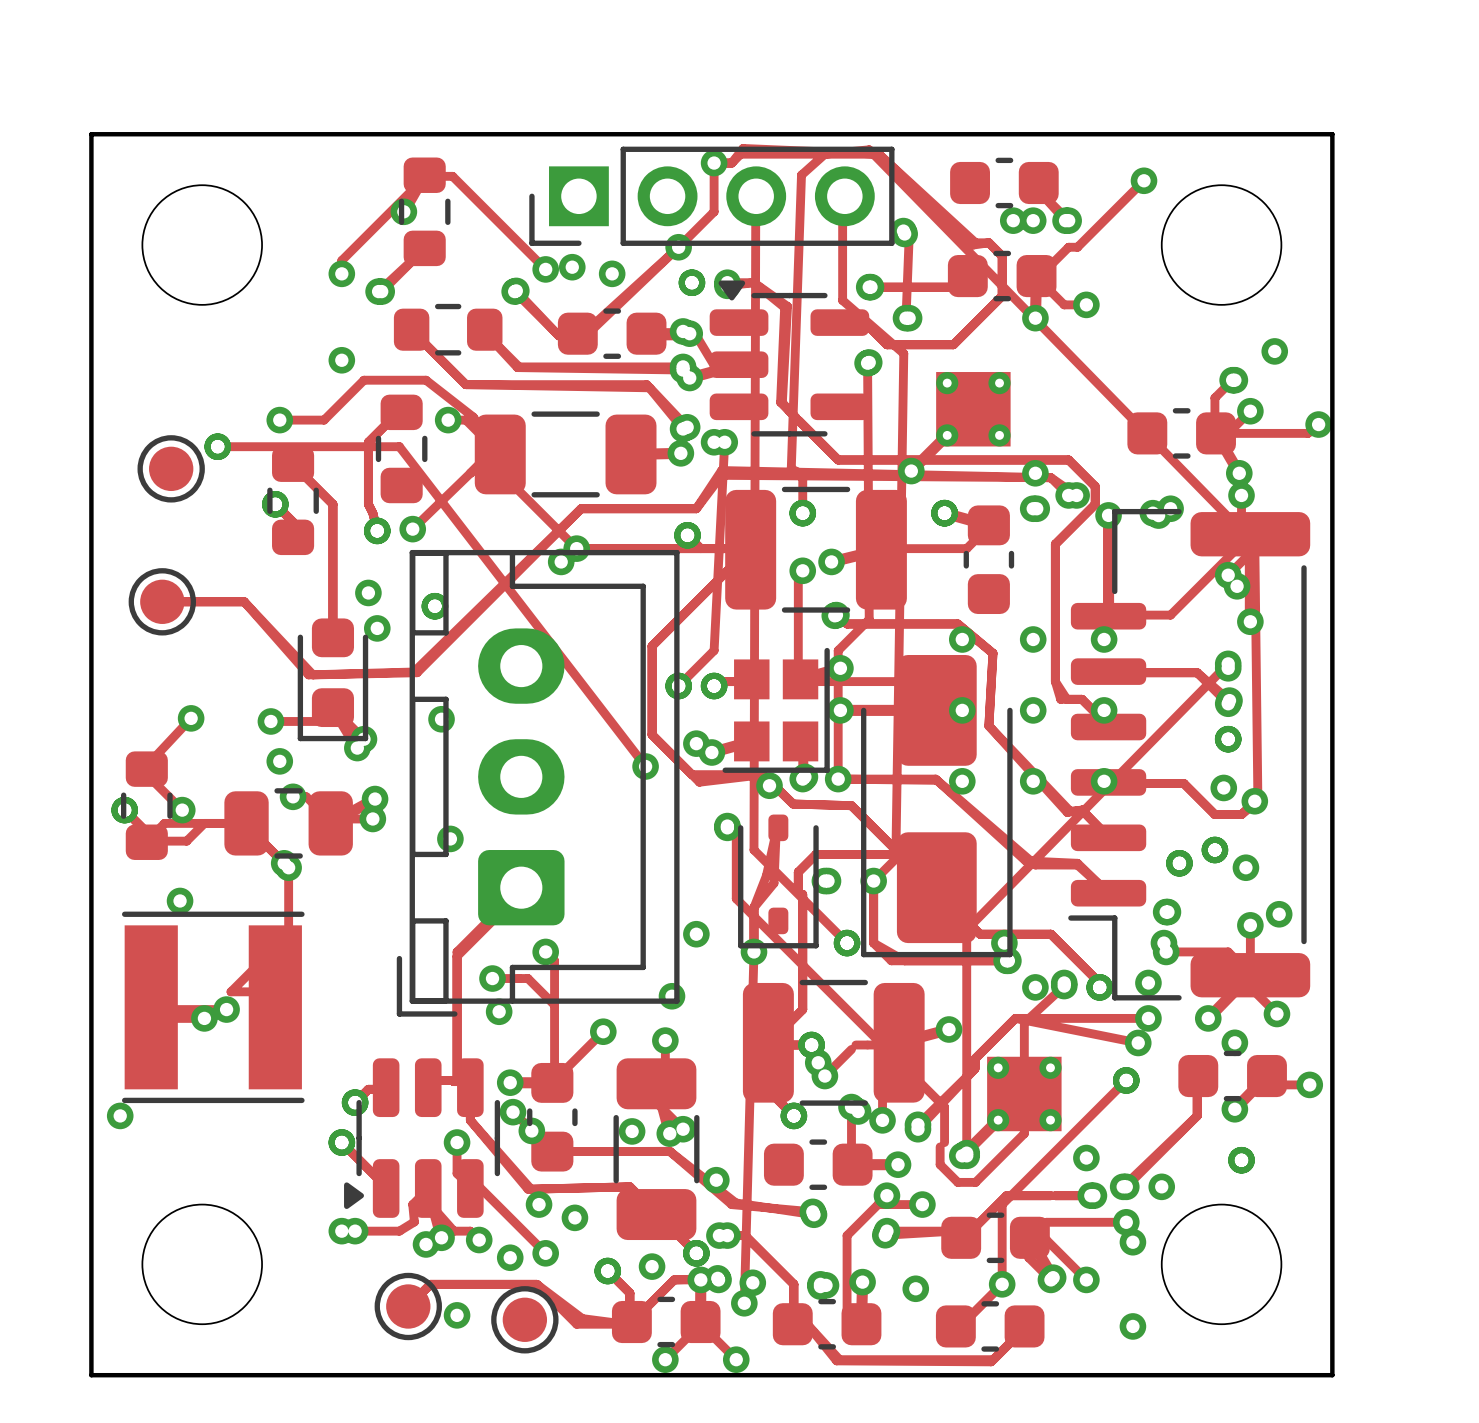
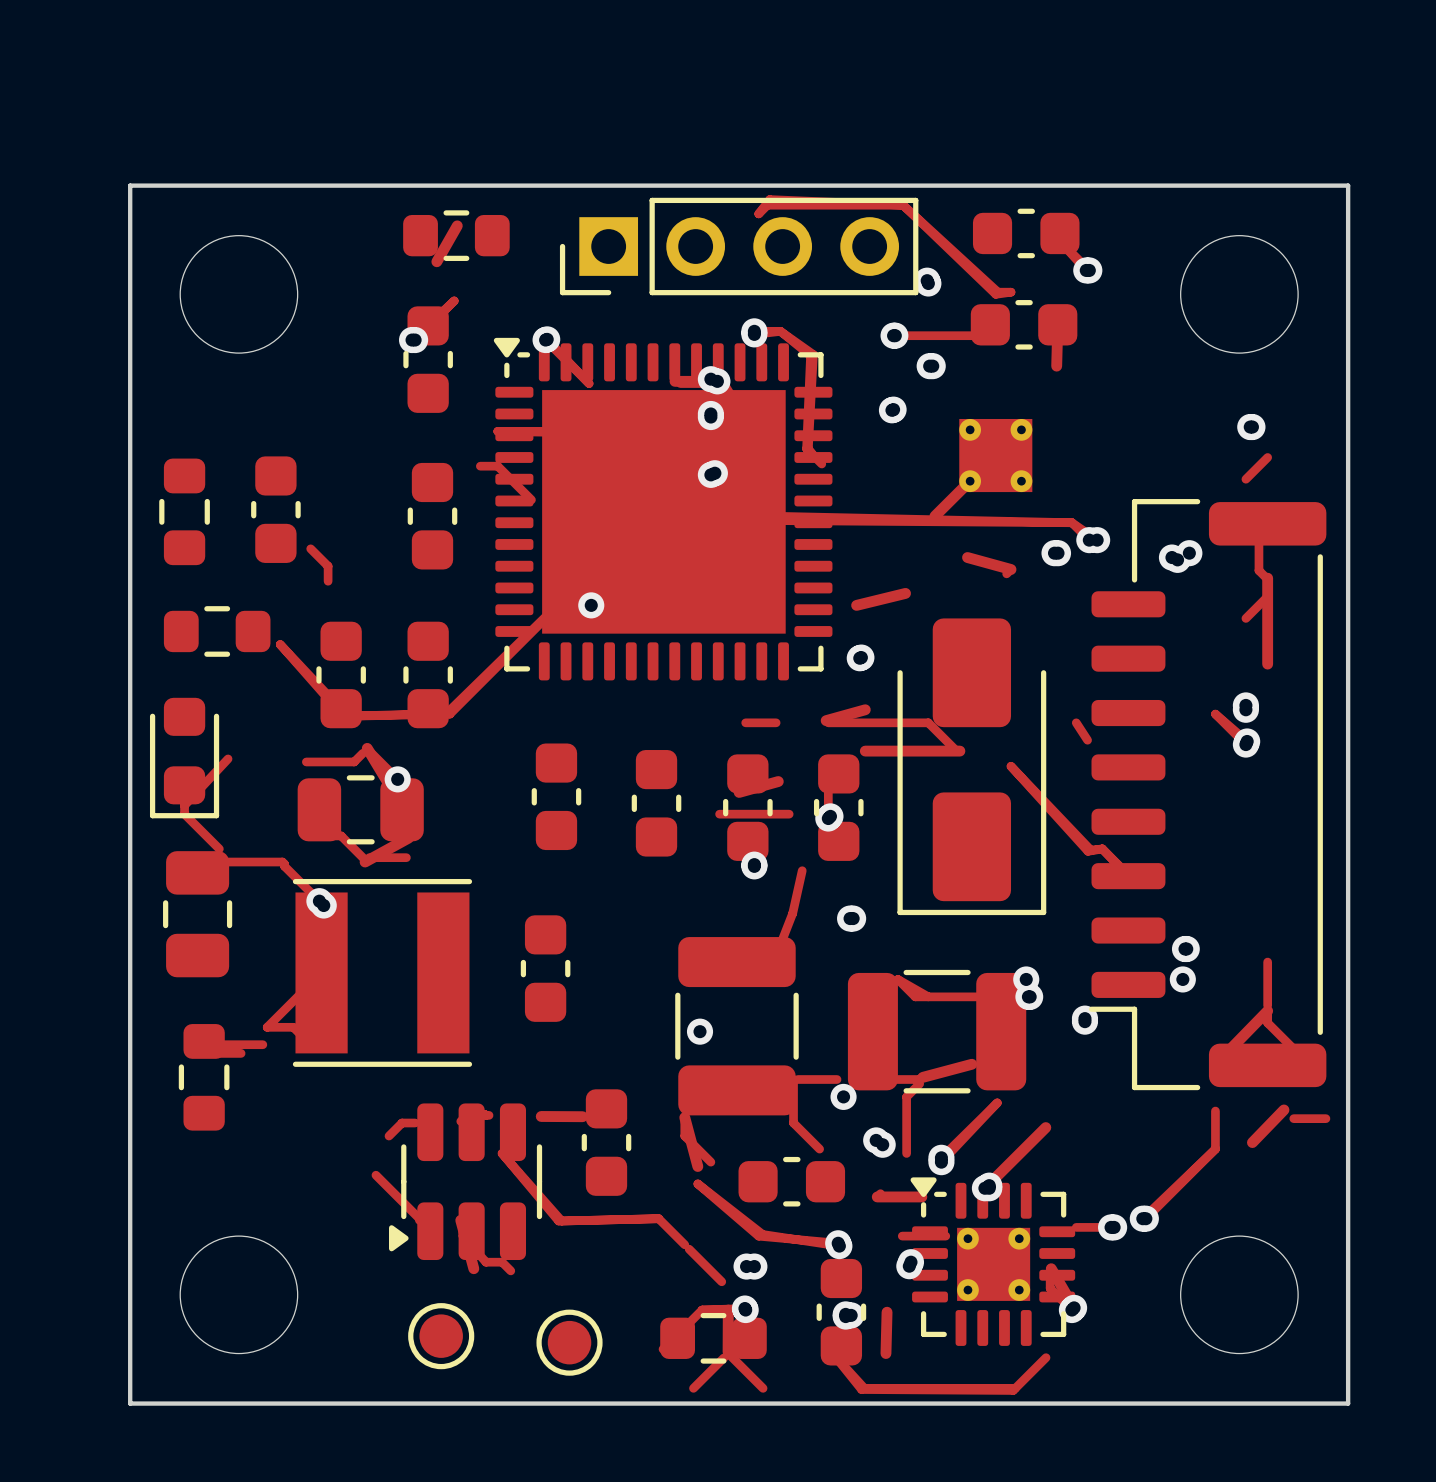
via: (714, 163) -> none
track: (731, 163) (714, 163) (714, 211) (678, 247) -> none
track: (425, 176) (452, 176) (545, 269) -> none
track: (424, 177) (341, 260) (341, 273) -> none
track: (1144, 180) (1077, 247) (1068, 247) (1039, 276) -> none
via: (1144, 180) -> none
track: (756, 196) (753, 850) (847, 943) -> none
track: (844, 196) (842, 202) (842, 300) (903, 353) (895, 858) (873, 881) (873, 943) -> none
via: (403, 211) -> none
part rotation: 0° (424, 211) -> 90° clockwise (456, 235)
via: (1013, 220) -> none
via: (1033, 220) -> none
track: (903, 231) (909, 238) (906, 318) -> none
track: (988, 242) (1002, 256) (1002, 296) (953, 344) (886, 344) (864, 322) (839, 322) -> none
track: (678, 247) (586, 330) (585, 335) (580, 335) (588, 333) (678, 247) -> none
via: (678, 247) -> none
via: (572, 267) -> none
via: (545, 269) -> none
via: (341, 273) -> none
via: (612, 273) -> none
via: (691, 282) -> none
track: (1042, 282) (1064, 304) (1086, 304) -> none
via: (1086, 304) -> none
part: none -> (428, 359)
via: (1035, 318) -> none
track: (411, 329) (465, 384) -> none
part: (448, 329) -> none
part: (612, 333) -> none
via: (1274, 351) -> none
part: (789, 358) -> none
via: (341, 360) -> none
track: (867, 363) (869, 619) (838, 650) (838, 779) -> none
track: (683, 366) (519, 366) (488, 335) (517, 367) (683, 370) -> none
via: (689, 378) -> none
track: (1232, 380) (1214, 397) (1214, 428) -> none
part footprint: [375, 394, 428, 504] -> [407, 462, 458, 570]
via: (1250, 411) -> none
track: (395, 415) (368, 442) (368, 504) (377, 530) -> none
track: (279, 420) (324, 420) (363, 380) (426, 380) (473, 417) (499, 453) -> none
via: (279, 420) -> none
via: (448, 420) -> none
track: (798, 420) (838, 459) (1068, 459) (1095, 486) (1095, 504) (1055, 544) (1055, 681) (1060, 699) (1081, 699) (1108, 725) -> none
track: (1318, 424) (1307, 433) (1216, 433) (1239, 473) -> none
via: (1318, 424) -> none
part: (1181, 433) -> none
part footprint: [137, 435, 205, 503] -> [159, 458, 210, 566]
via: (714, 442) -> none
track: (724, 442) (714, 650) (678, 686) -> none
via: (724, 442) -> none
track: (217, 446) (399, 446) (645, 766) -> none
via: (217, 446) -> none
via: (680, 453) -> none
part: (565, 454) -> none
track: (496, 455) (488, 455) (412, 529) -> none
track: (485, 457) (576, 548) (745, 548) -> none
part: none -> (663, 509)
part: none -> (275, 509)
track: (293, 464) (332, 504) (332, 637) -> none
via: (911, 471) -> none
via: (1035, 473) -> none
via: (1239, 473) -> none
via: (1241, 495) -> none
part: (293, 500) -> none
via: (275, 504) -> none
track: (581, 508) (696, 508) -> none
part footprint: [1068, 508, 1311, 1001] -> [1088, 499, 1327, 1091]
track: (802, 513) (802, 474) (791, 468) (801, 175) (824, 154) (869, 149) (1254, 544) (1257, 801) (1241, 814) -> none
via: (802, 513) -> none
via: (944, 513) -> none
track: (1108, 515) (1108, 616) -> none
via: (1108, 515) -> none
via: (412, 529) -> none
via: (377, 530) -> none
track: (984, 530) (966, 548) (886, 548) -> none
via: (687, 535) -> none
track: (1245, 539) (1170, 615) (1112, 615) -> none
via: (576, 548) -> none
part footprint: [396, 549, 680, 1017] -> [531, 743, 582, 851]
part: (816, 549) -> none
track: (745, 553) (652, 646) (652, 734) (699, 782) (762, 774) (793, 804) (851, 805) (931, 885) -> none
part: (988, 559) -> none
via: (831, 561) -> none
part footprint: [128, 568, 197, 636] -> [163, 606, 271, 657]
via: (802, 570) -> none
track: (798, 575) (798, 677) -> none
via: (1228, 575) -> none
via: (1237, 586) -> none
via: (368, 592) -> none
track: (162, 601) (244, 601) -> none
via: (434, 606) -> none
via: (1250, 621) -> none
track: (847, 623) (957, 623) (992, 653) (988, 725) -> none
via: (377, 628) -> none
part: none -> (341, 674)
part: none -> (428, 674)
via: (962, 639) -> none
via: (1033, 639) -> none
via: (1104, 639) -> none
track: (1228, 663) (966, 929) (966, 1153) -> none
via: (840, 668) -> none
track: (1108, 671) (1197, 672) -> none
part position: (332, 679) -> (184, 758)
via: (678, 686) -> none
via: (714, 686) -> none
part: (776, 710) -> none
via: (840, 710) -> none
via: (962, 710) -> none
via: (1033, 710) -> none
via: (1104, 710) -> none
via: (191, 718) -> none
via: (441, 719) -> none
via: (270, 721) -> none
via: (1228, 739) -> none
via: (696, 743) -> none
via: (357, 748) -> none
via: (711, 752) -> none
via: (279, 761) -> none
part: none -> (656, 803)
via: (645, 766) -> none
part: none -> (747, 807)
part: none -> (838, 807)
track: (838, 779) (935, 779) (1025, 860) (1077, 863) (1108, 893) (1077, 865) (1035, 864) (936, 780) (838, 779) -> none
via: (838, 779) -> none
via: (962, 781) -> none
via: (1033, 781) -> none
via: (1104, 781) -> none
track: (1108, 782) (1183, 783) (1214, 814) (1241, 814) -> none
via: (769, 785) -> none
via: (1223, 787) -> none
via: (293, 796) -> none
via: (375, 799) -> none
via: (1254, 801) -> none
part position: (146, 805) -> (204, 1077)
part position: (936, 806) -> (971, 766)
track: (124, 810) (146, 832) (146, 842) (186, 841) (204, 823) -> none
via: (124, 810) -> none
via: (182, 810) -> none
via: (372, 818) -> none
part position: (288, 823) -> (360, 809)
track: (727, 826) (736, 836) (736, 898) (944, 1107) (944, 1142) -> none
track: (778, 827) (776, 832) (773, 883) (753, 907) (744, 1303) -> none
via: (450, 838) -> none
via: (1214, 850) -> none
track: (900, 854) (816, 854) (798, 872) (798, 889) -> none
via: (1179, 863) -> none
via: (1245, 867) -> none
part: none -> (197, 914)
part: (778, 881) -> none
via: (873, 881) -> none
track: (936, 887) (936, 891) (980, 934) (1050, 934) (1099, 982) -> none
track: (802, 894) (802, 1009) (769, 1042) -> none
via: (180, 900) -> none
via: (1279, 914) -> none
via: (1250, 925) -> none
part: none -> (545, 968)
via: (696, 934) -> none
via: (847, 943) -> none
track: (545, 951) (554, 960) (554, 1080) (603, 1031) -> none
via: (545, 951) -> none
via: (753, 951) -> none
track: (1166, 951) (1228, 951) (1245, 969) -> none
via: (1166, 951) -> none
track: (457, 956) (521, 892) (521, 887) (457, 951) (457, 1081) (458, 1080) -> none
track: (492, 978) (527, 978) (554, 1005) -> none
via: (492, 978) -> none
via: (1148, 982) -> none
track: (1064, 986) (1024, 1022) (1024, 1133) (975, 1182) (957, 1182) (940, 1164) (940, 1146) -> none
via: (1035, 987) -> none
via: (1099, 987) -> none
part: none -> (736, 1026)
part: none -> (937, 1031)
part position: (213, 1007) -> (382, 972)
via: (226, 1009) -> none
via: (499, 1011) -> none
via: (1276, 1013) -> none
via: (204, 1018) -> none
track: (1015, 1018) (1148, 1018) -> none
track: (1015, 1018) (975, 1058) (974, 1068) -> none
track: (1015, 1018) (1138, 1042) -> none
via: (1148, 1018) -> none
via: (1208, 1018) -> none
via: (949, 1029) -> none
via: (603, 1031) -> none
via: (665, 1040) -> none
part: (833, 1042) -> none
via: (1138, 1042) -> none
via: (1234, 1042) -> none
via: (811, 1045) -> none
track: (855, 1045) (867, 1045) -> none
track: (851, 1049) (824, 1076) -> none
via: (824, 1076) -> none
part: (1232, 1076) -> none
track: (1126, 1080) (1002, 1204) (1002, 1284) (960, 1326) (955, 1326) -> none
via: (1126, 1080) -> none
via: (510, 1082) -> none
via: (1309, 1084) -> none
part: (1024, 1093) -> none
via: (355, 1102) -> none
track: (851, 1107) (851, 1151) -> none
via: (1234, 1109) -> none
track: (513, 1112) (552, 1149) (552, 1151) (669, 1151) -> none
via: (513, 1112) -> none
via: (120, 1115) -> none
via: (793, 1115) -> none
part position: (552, 1117) -> (606, 1142)
via: (882, 1120) -> none
via: (683, 1129) -> none
via: (531, 1130) -> none
via: (632, 1131) -> none
via: (669, 1133) -> none
part position: (422, 1138) -> (465, 1181)
via: (341, 1142) -> none
track: (457, 1142) (457, 1173) (470, 1188) (479, 1186) (545, 1253) -> none
via: (457, 1142) -> none
part: (656, 1149) -> none
via: (1086, 1158) -> none
via: (1241, 1160) -> none
part position: (818, 1164) -> (791, 1181)
via: (898, 1164) -> none
via: (716, 1180) -> none
via: (1161, 1186) -> none
track: (428, 1189) (412, 1204) (414, 1221) (399, 1231) (355, 1231) -> none
track: (886, 1195) (847, 1235) (847, 1329) -> none
via: (886, 1195) -> none
track: (1050, 1195) (1006, 1195) (964, 1237) -> none
via: (539, 1204) -> none
via: (922, 1204) -> none
part footprint: [941, 1212, 1050, 1264] -> [910, 1177, 1076, 1346]
via: (574, 1217) -> none
track: (1126, 1222) (1046, 1222) (1030, 1237) -> none
via: (1126, 1222) -> none
via: (341, 1231) -> none
via: (355, 1231) -> none
track: (886, 1231) (953, 1231) (885, 1235) -> none
track: (719, 1235) (745, 1235) (793, 1284) (793, 1319) -> none
via: (441, 1237) -> none
via: (479, 1240) -> none
track: (1033, 1240) (1046, 1240) (1086, 1279) -> none
via: (1132, 1242) -> none
via: (426, 1244) -> none
via: (545, 1253) -> none
via: (696, 1253) -> none
via: (510, 1257) -> none
via: (652, 1266) -> none
track: (607, 1271) (629, 1293) (629, 1319) -> none
via: (607, 1271) -> none
via: (700, 1279) -> none
via: (1086, 1279) -> none
via: (752, 1282) -> none
via: (862, 1282) -> none
track: (536, 1284) (582, 1318) (625, 1324) (576, 1324) (536, 1284) -> none
track: (536, 1284) (430, 1284) (408, 1306) -> none
via: (1002, 1284) -> none
via: (915, 1288) -> none
part footprint: [611, 1296, 721, 1348] -> [660, 1312, 767, 1364]
via: (744, 1303) -> none
via: (457, 1315) -> none
part position: (524, 1319) -> (569, 1342)
part rotation: 0° (827, 1324) -> 90° clockwise (841, 1312)
part: (990, 1326) -> none
via: (1132, 1326) -> none
via: (665, 1359) -> none
via: (736, 1359) -> none

